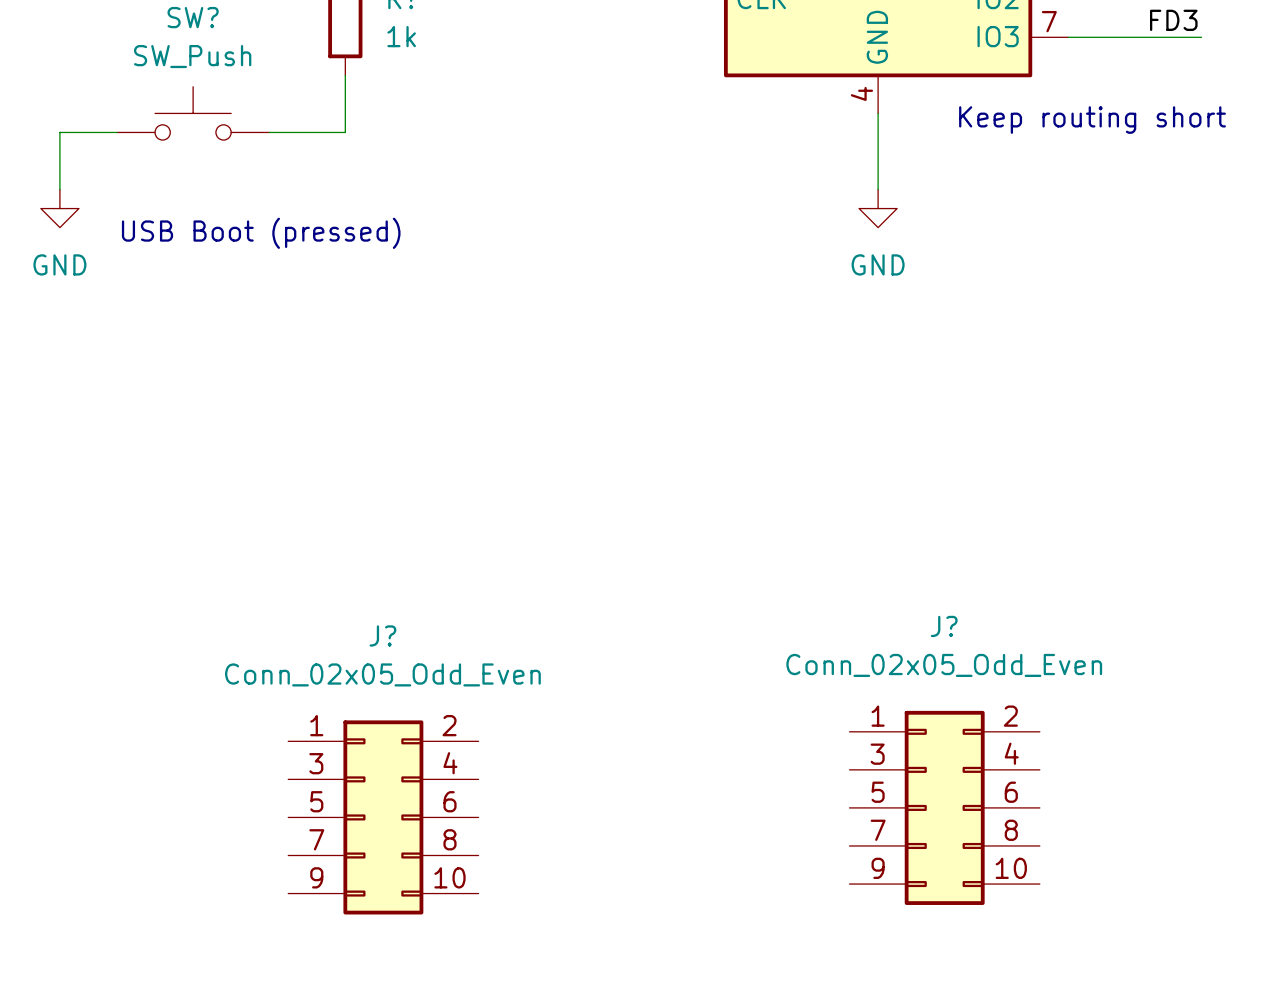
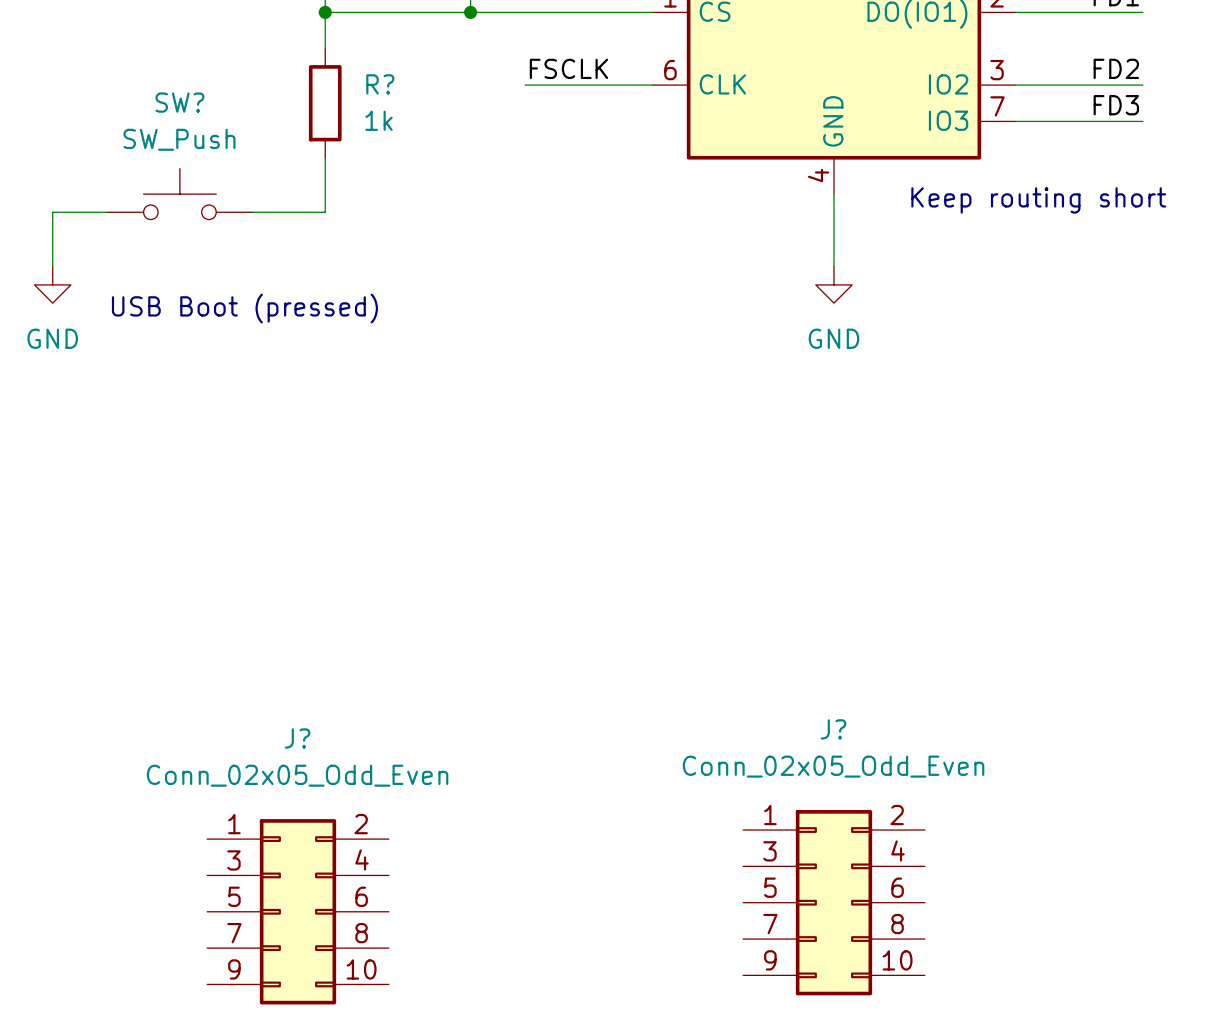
J? position: (944, 807) -> (833, 902)
J? position: (383, 817) -> (297, 911)

